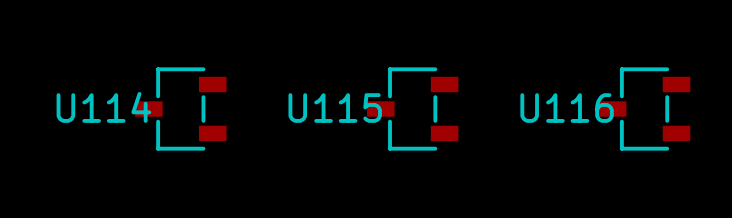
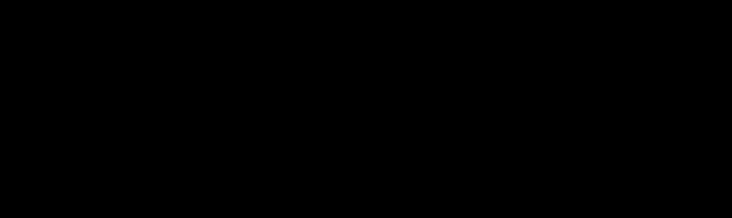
U114: (180, 108) -> none
U115: (412, 108) -> none
U116: (644, 108) -> none

